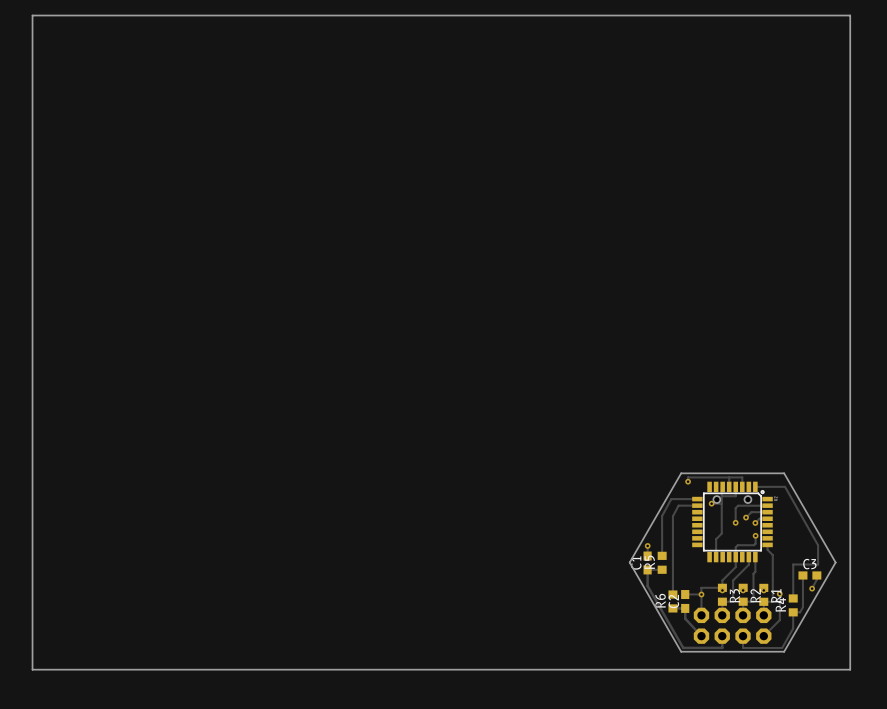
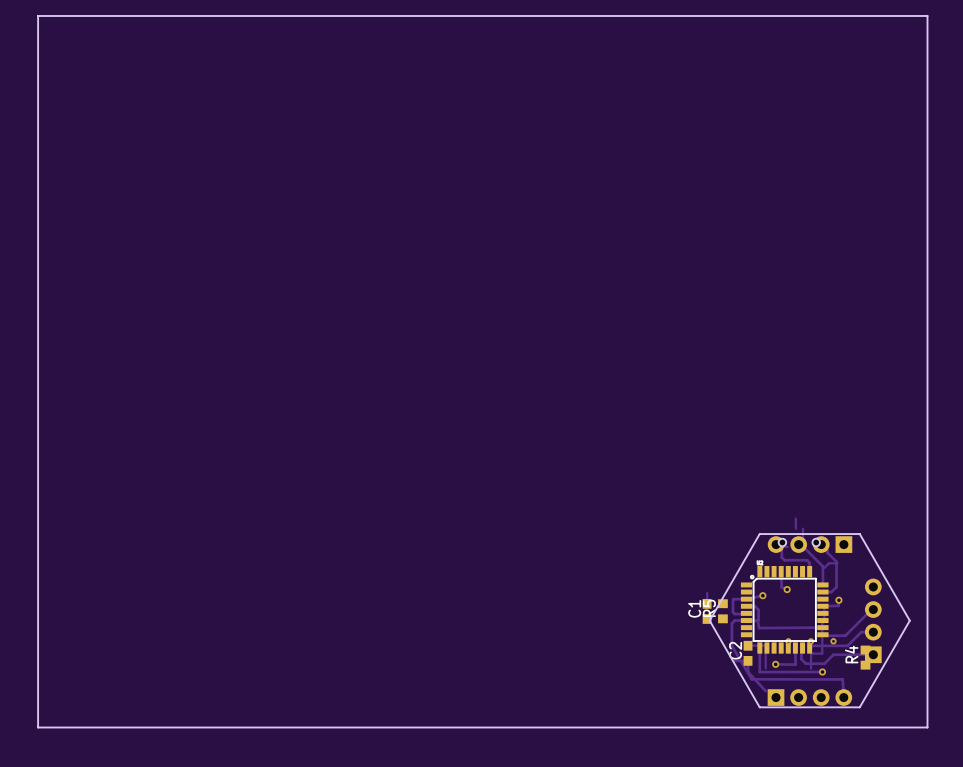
board edge: (784, 473) (681, 473) (629, 562) (681, 651) (784, 651) (835, 562) (784, 473) -> (859, 534) (909, 620) (859, 707) (759, 707) (709, 620) (759, 534) (859, 534)
track: (688, 481) (688, 477) (742, 477) (742, 486) -> none
via: (688, 481) -> none
track: (722, 486) (721, 533) (716, 539) (715, 556) -> none
track: (755, 486) (785, 486) (818, 545) (818, 564) (793, 564) (793, 598) -> none
track: (735, 496) (721, 496) -> none
track: (697, 499) (671, 499) (662, 516) (662, 555) -> none
track: none -> (776, 544) (781, 550) (781, 557) (784, 560) (807, 560) (809, 562) (809, 571)
track: none -> (798, 544) (822, 566) (822, 584)
part: none -> (809, 544)
track: none -> (821, 544) (836, 561) (836, 587) (831, 592) (822, 592)
via: (711, 503) -> none
track: (697, 505) (678, 505) (672, 516) (672, 594) -> none
track: (767, 505) (738, 505) (735, 508) (735, 522) -> none
track: (767, 512) (751, 512) (746, 517) -> none
via: (746, 517) -> none
part rotation: 0° (732, 521) -> 90° counterclockwise (784, 609)
via: (735, 522) -> none
via: (755, 522) -> none
track: none -> (781, 571) (781, 587) (787, 589)
track: (755, 535) (754, 545) (737, 545) (735, 547) (735, 567) (722, 580) (722, 590) -> none
via: (755, 535) -> none
via: none -> (787, 589)
track: (767, 544) (767, 549) (772, 555) (772, 601) (763, 601) (763, 615) -> none
via: (647, 545) -> none
track: none -> (762, 595) (732, 599) (734, 614) (746, 613)
via: none -> (762, 595)
track: none -> (838, 600) (838, 605) (822, 606)
via: none -> (838, 600)
track: (748, 557) (748, 564) (733, 580) (733, 601) (722, 601) (722, 615) -> none
track: none -> (746, 606) (754, 606) (758, 609) (757, 620)
track: none -> (873, 609) (845, 635) (822, 634)
track: (662, 569) (647, 569) (647, 585) (683, 647) (722, 647) (722, 636) -> none
track: none -> (757, 620) (734, 620) (731, 623) (731, 646) (751, 679) (842, 679) (843, 697)
track: none -> (757, 620) (759, 628) (822, 627)
part: none -> (873, 620)
track: (802, 575) (802, 607) (800, 612) (793, 612) (793, 628) (782, 648) (743, 648) (743, 636) -> none
C3: (809, 575) -> none
track: (816, 575) (812, 588) -> none
track: none -> (873, 632) (861, 632) (847, 645) (811, 645) (809, 648)
track: (722, 587) (701, 587) (701, 594) -> none
via: (812, 588) -> none
track: (779, 593) (779, 620) (763, 636) -> none
via: (779, 593) -> none
via: (701, 594) -> none
R3: (722, 594) -> none
R2: (743, 594) -> none
R1: (763, 594) -> none
track: none -> (759, 648) (759, 672) (822, 672)
track: none -> (795, 648) (795, 664) (775, 664)
track: none -> (802, 648) (801, 659) (805, 663) (824, 663) (833, 654) (873, 654)
R6: (672, 601) -> none
via: none -> (775, 664)
via: none -> (822, 672)
part: (732, 625) -> none
part: none -> (809, 697)

